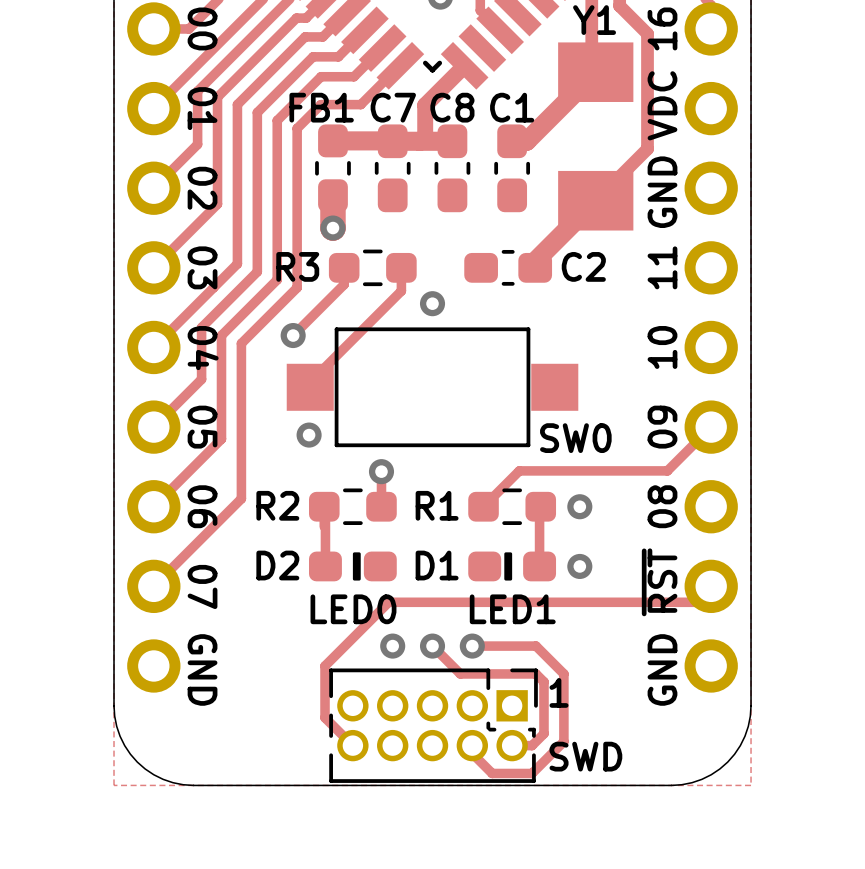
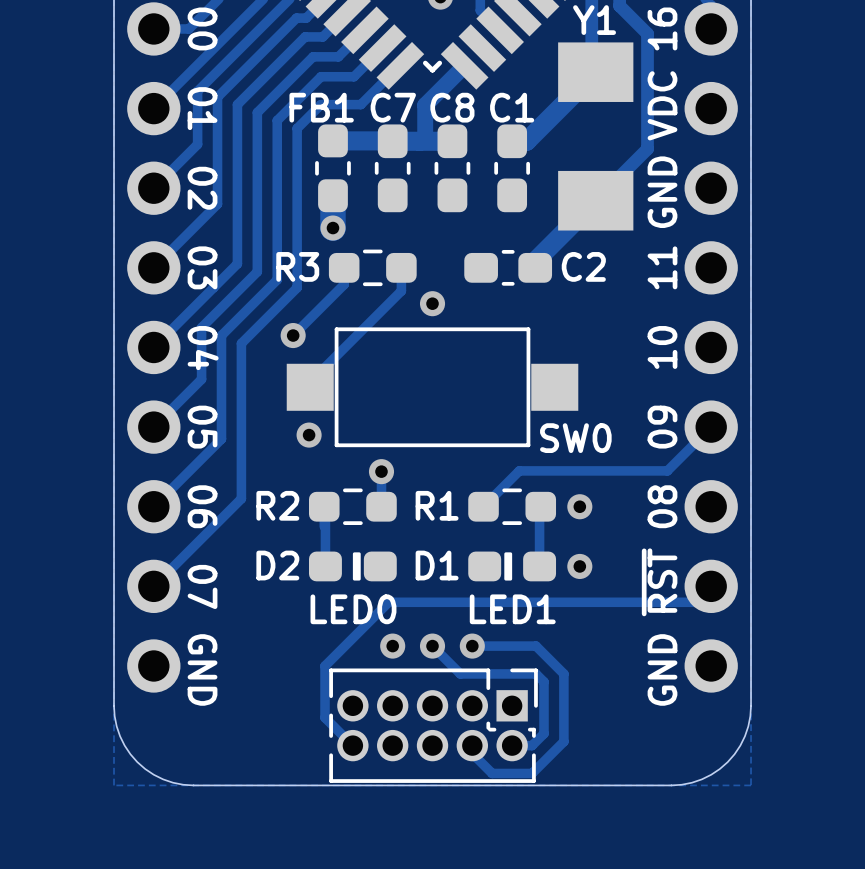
text: 1 (559, 692) -> none
text: SWD (585, 756) -> none

